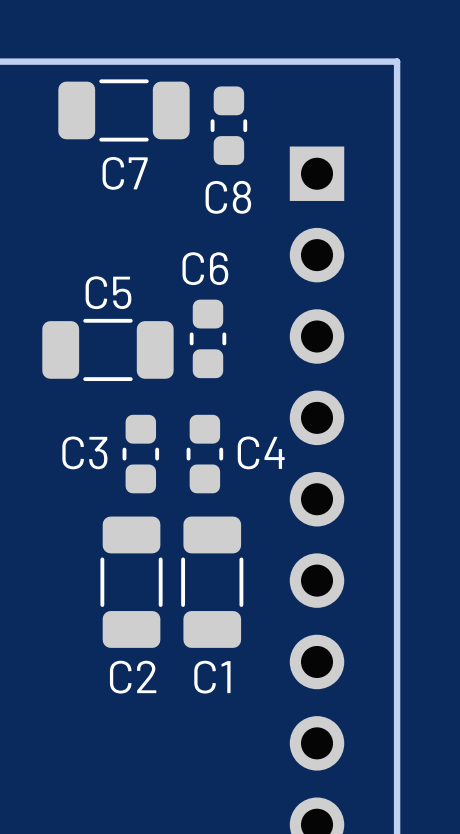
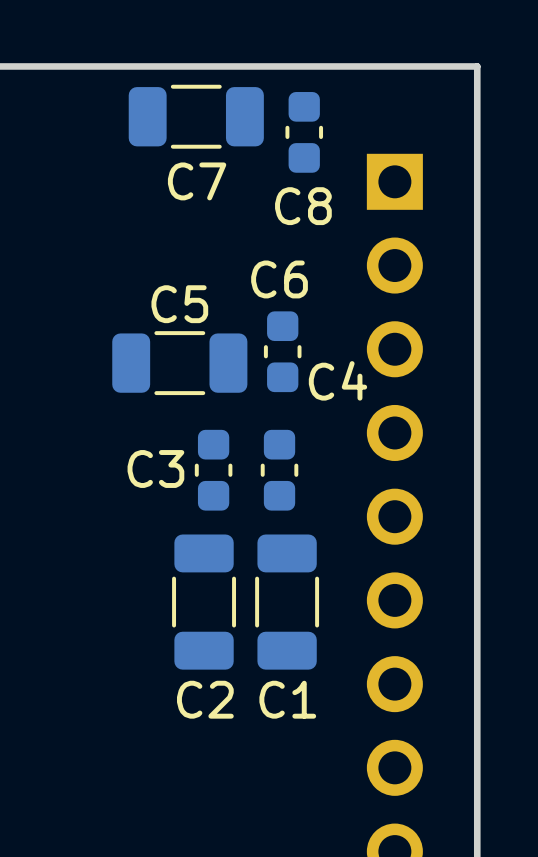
C4 name position: C4 (261, 452) -> C4 (337, 380)

